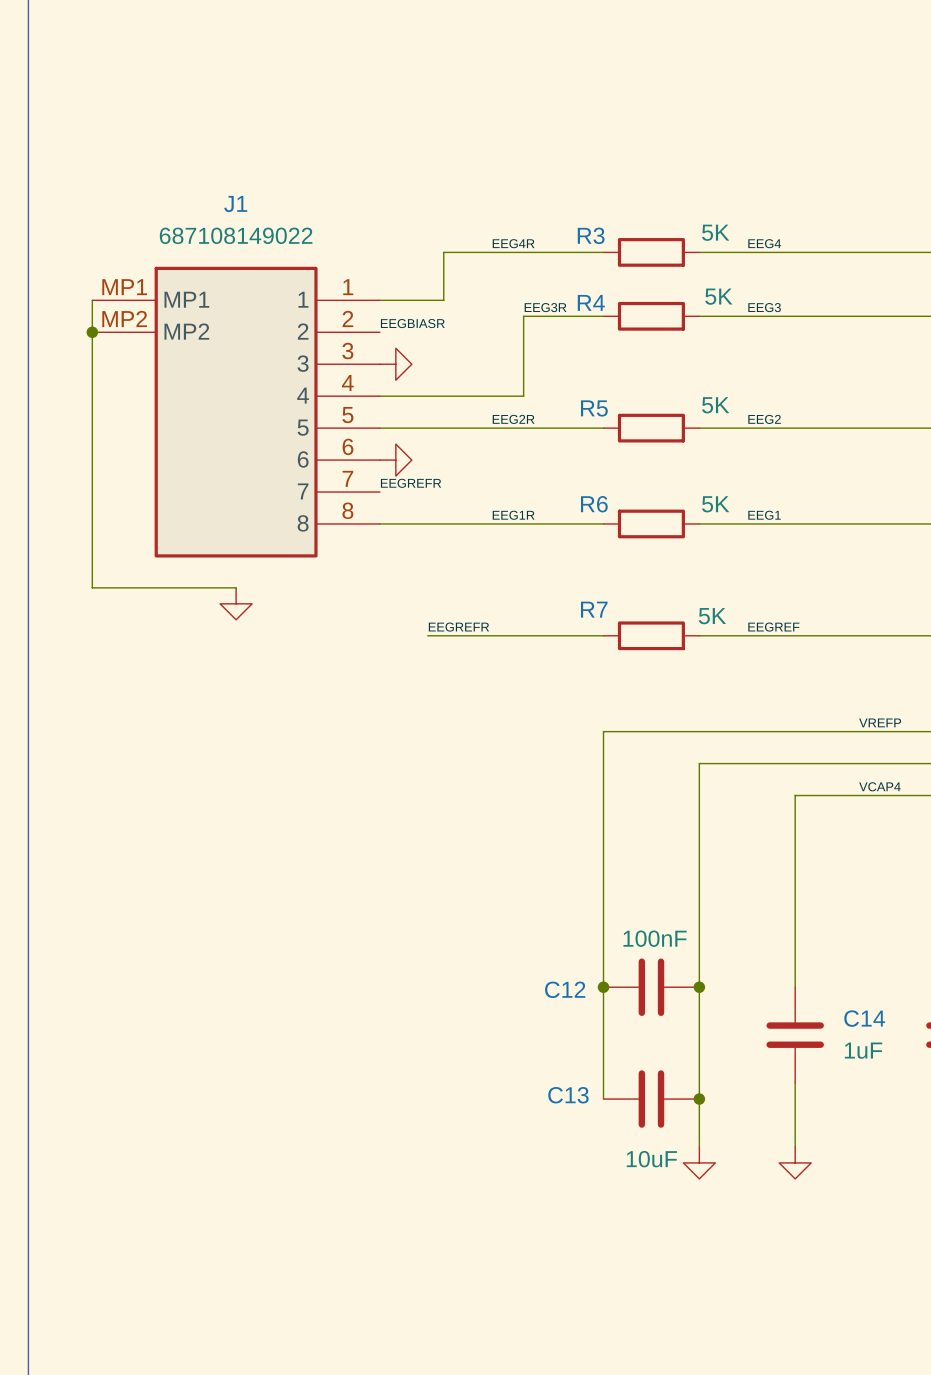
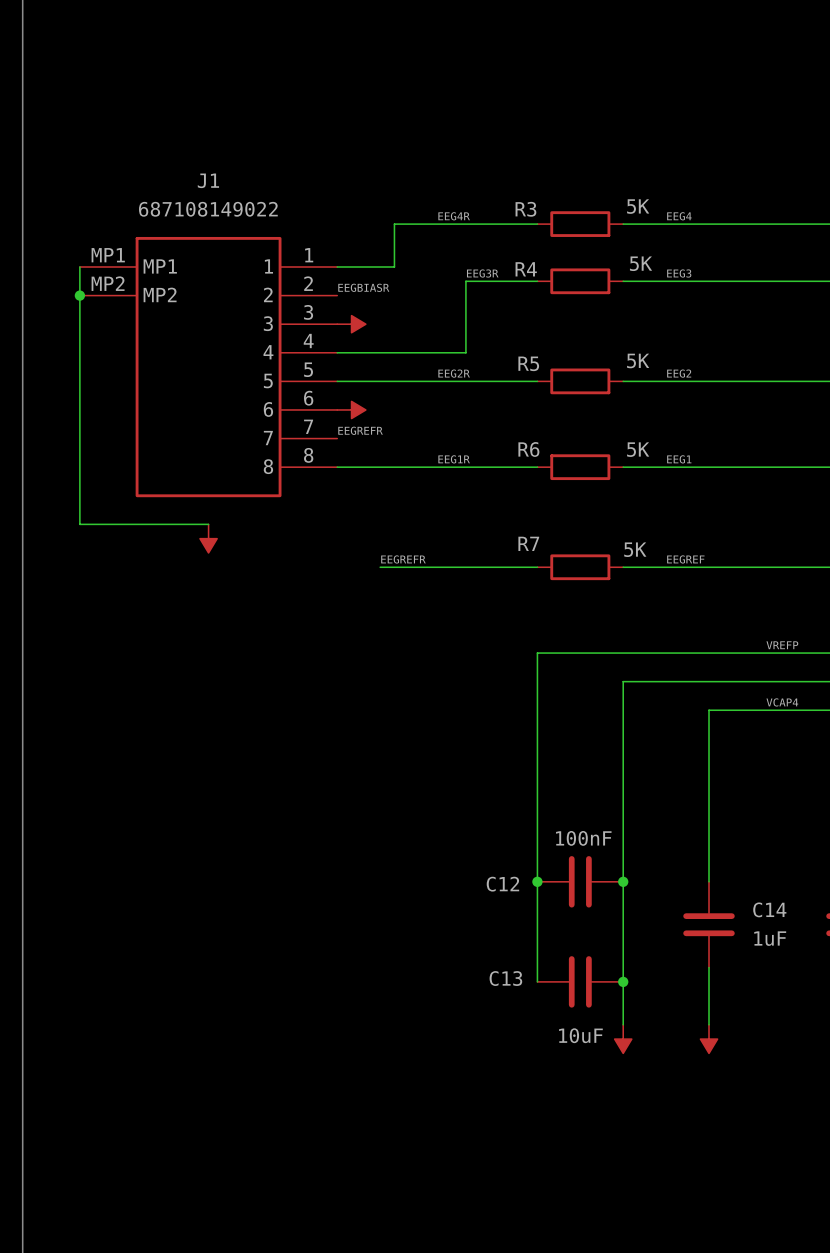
power symbol shape: [379, 348, 412, 381] -> [337, 315, 366, 333]
power symbol shape: [379, 444, 412, 477] -> [337, 401, 366, 419]
power symbol shape: [220, 587, 253, 620] -> [199, 524, 218, 553]
power symbol shape: [683, 1146, 716, 1179] -> [614, 1024, 632, 1054]
power symbol shape: [779, 1146, 812, 1179] -> [700, 1024, 718, 1054]

